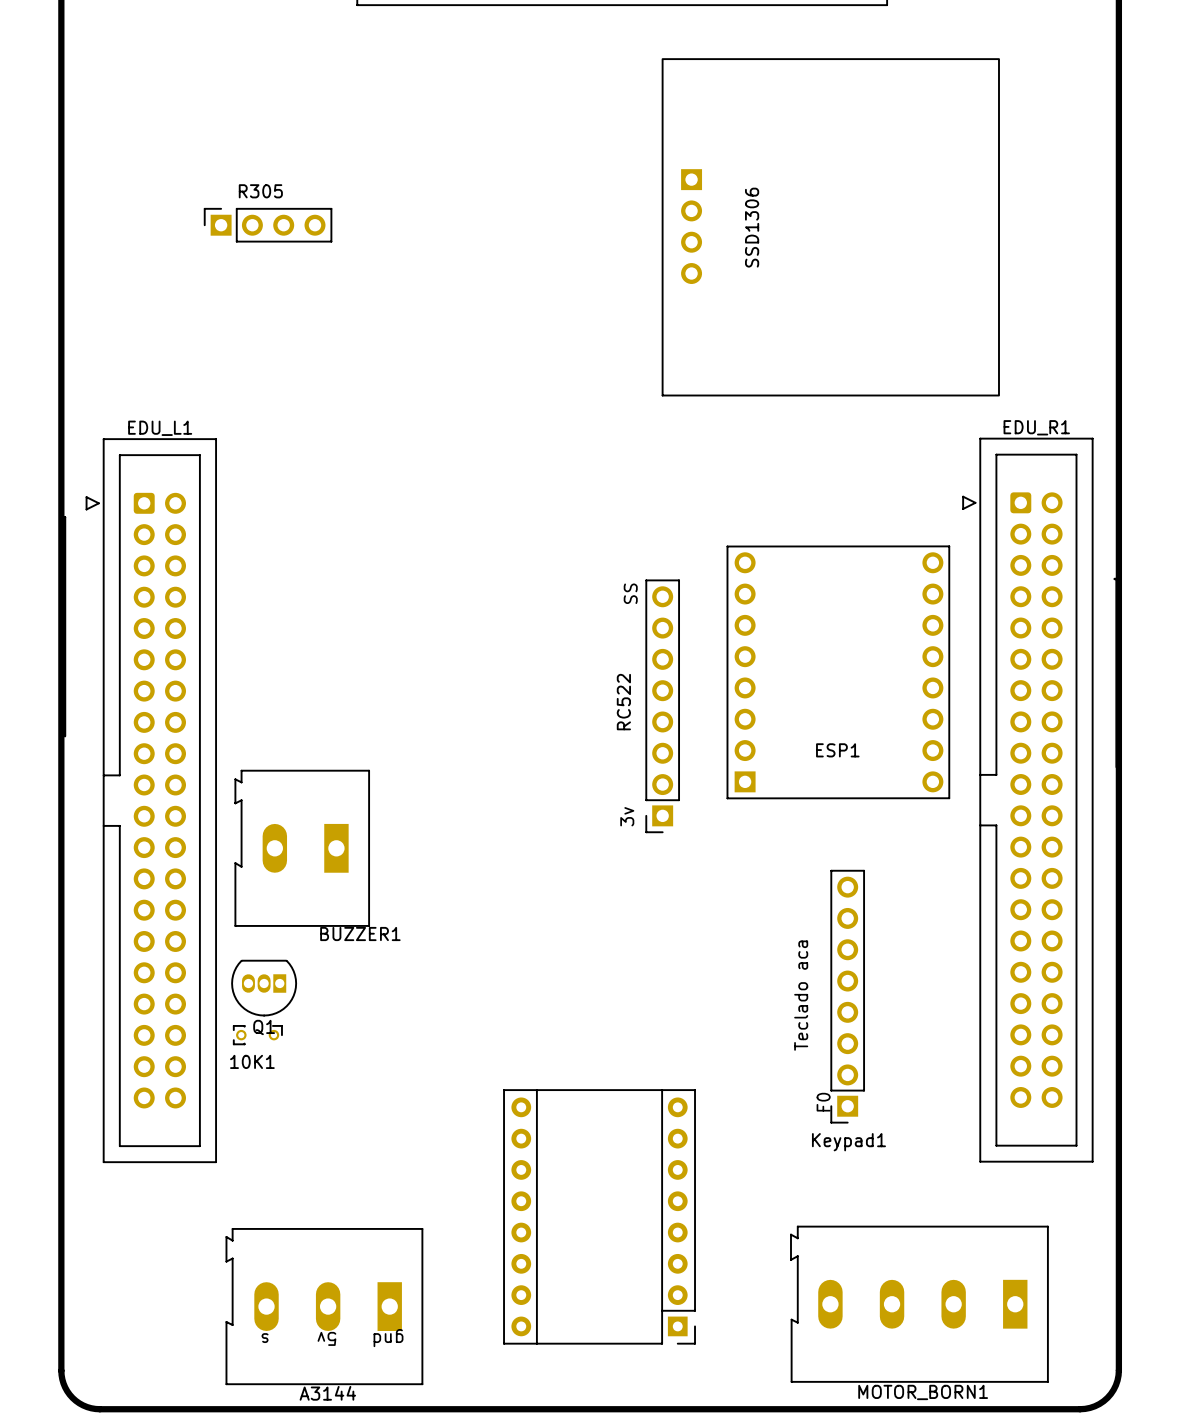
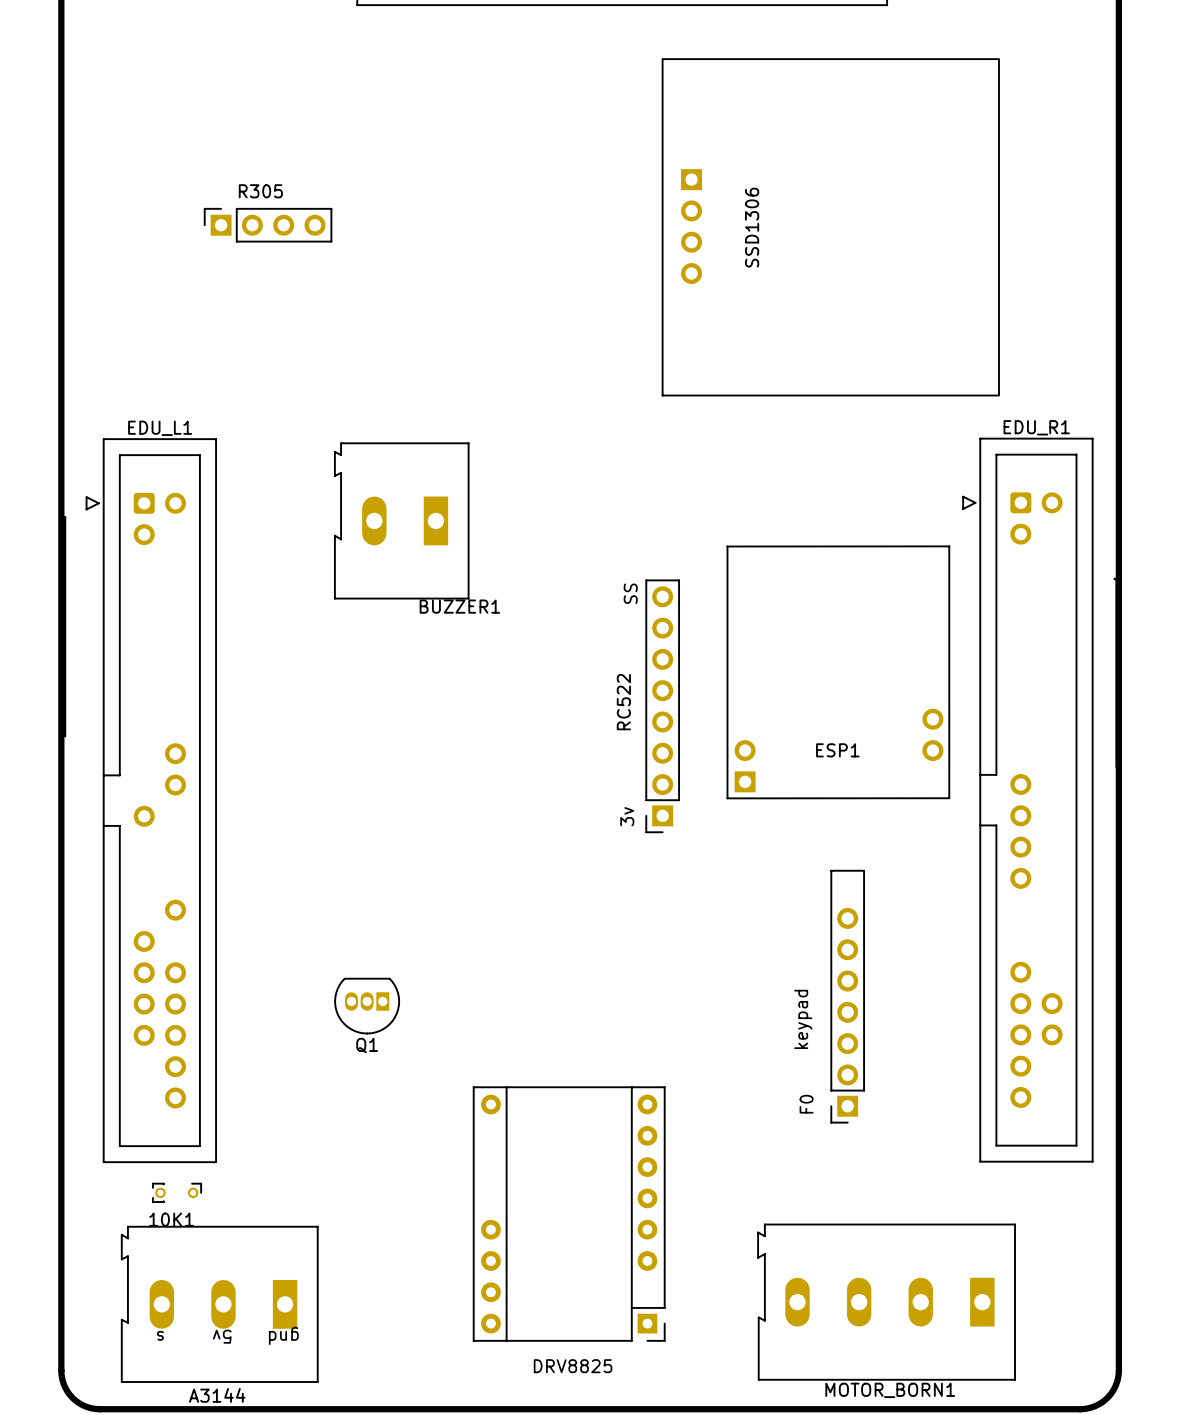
EDU_R1 footprint: [962, 437, 1094, 1163] -> [962, 437, 1094, 1163]
EDU_L1 footprint: [85, 438, 217, 1163] -> [85, 438, 217, 1163]
ESP1 footprint: [726, 545, 951, 800] -> [726, 545, 951, 800]
BUZZER1 position: (302, 848) -> (401, 520)
Q1 position: (264, 988) -> (367, 1006)
Keypad1: (847, 996) -> none
part: none -> (847, 996)
10K1 position: (257, 1035) -> (177, 1192)
part: none -> (569, 1214)
part: (599, 1216) -> none
MOTOR_BORN1 position: (919, 1304) -> (886, 1302)
A3144 position: (324, 1306) -> (219, 1304)
A3144 name position: A3144 (327, 1393) -> A3144 (217, 1395)

